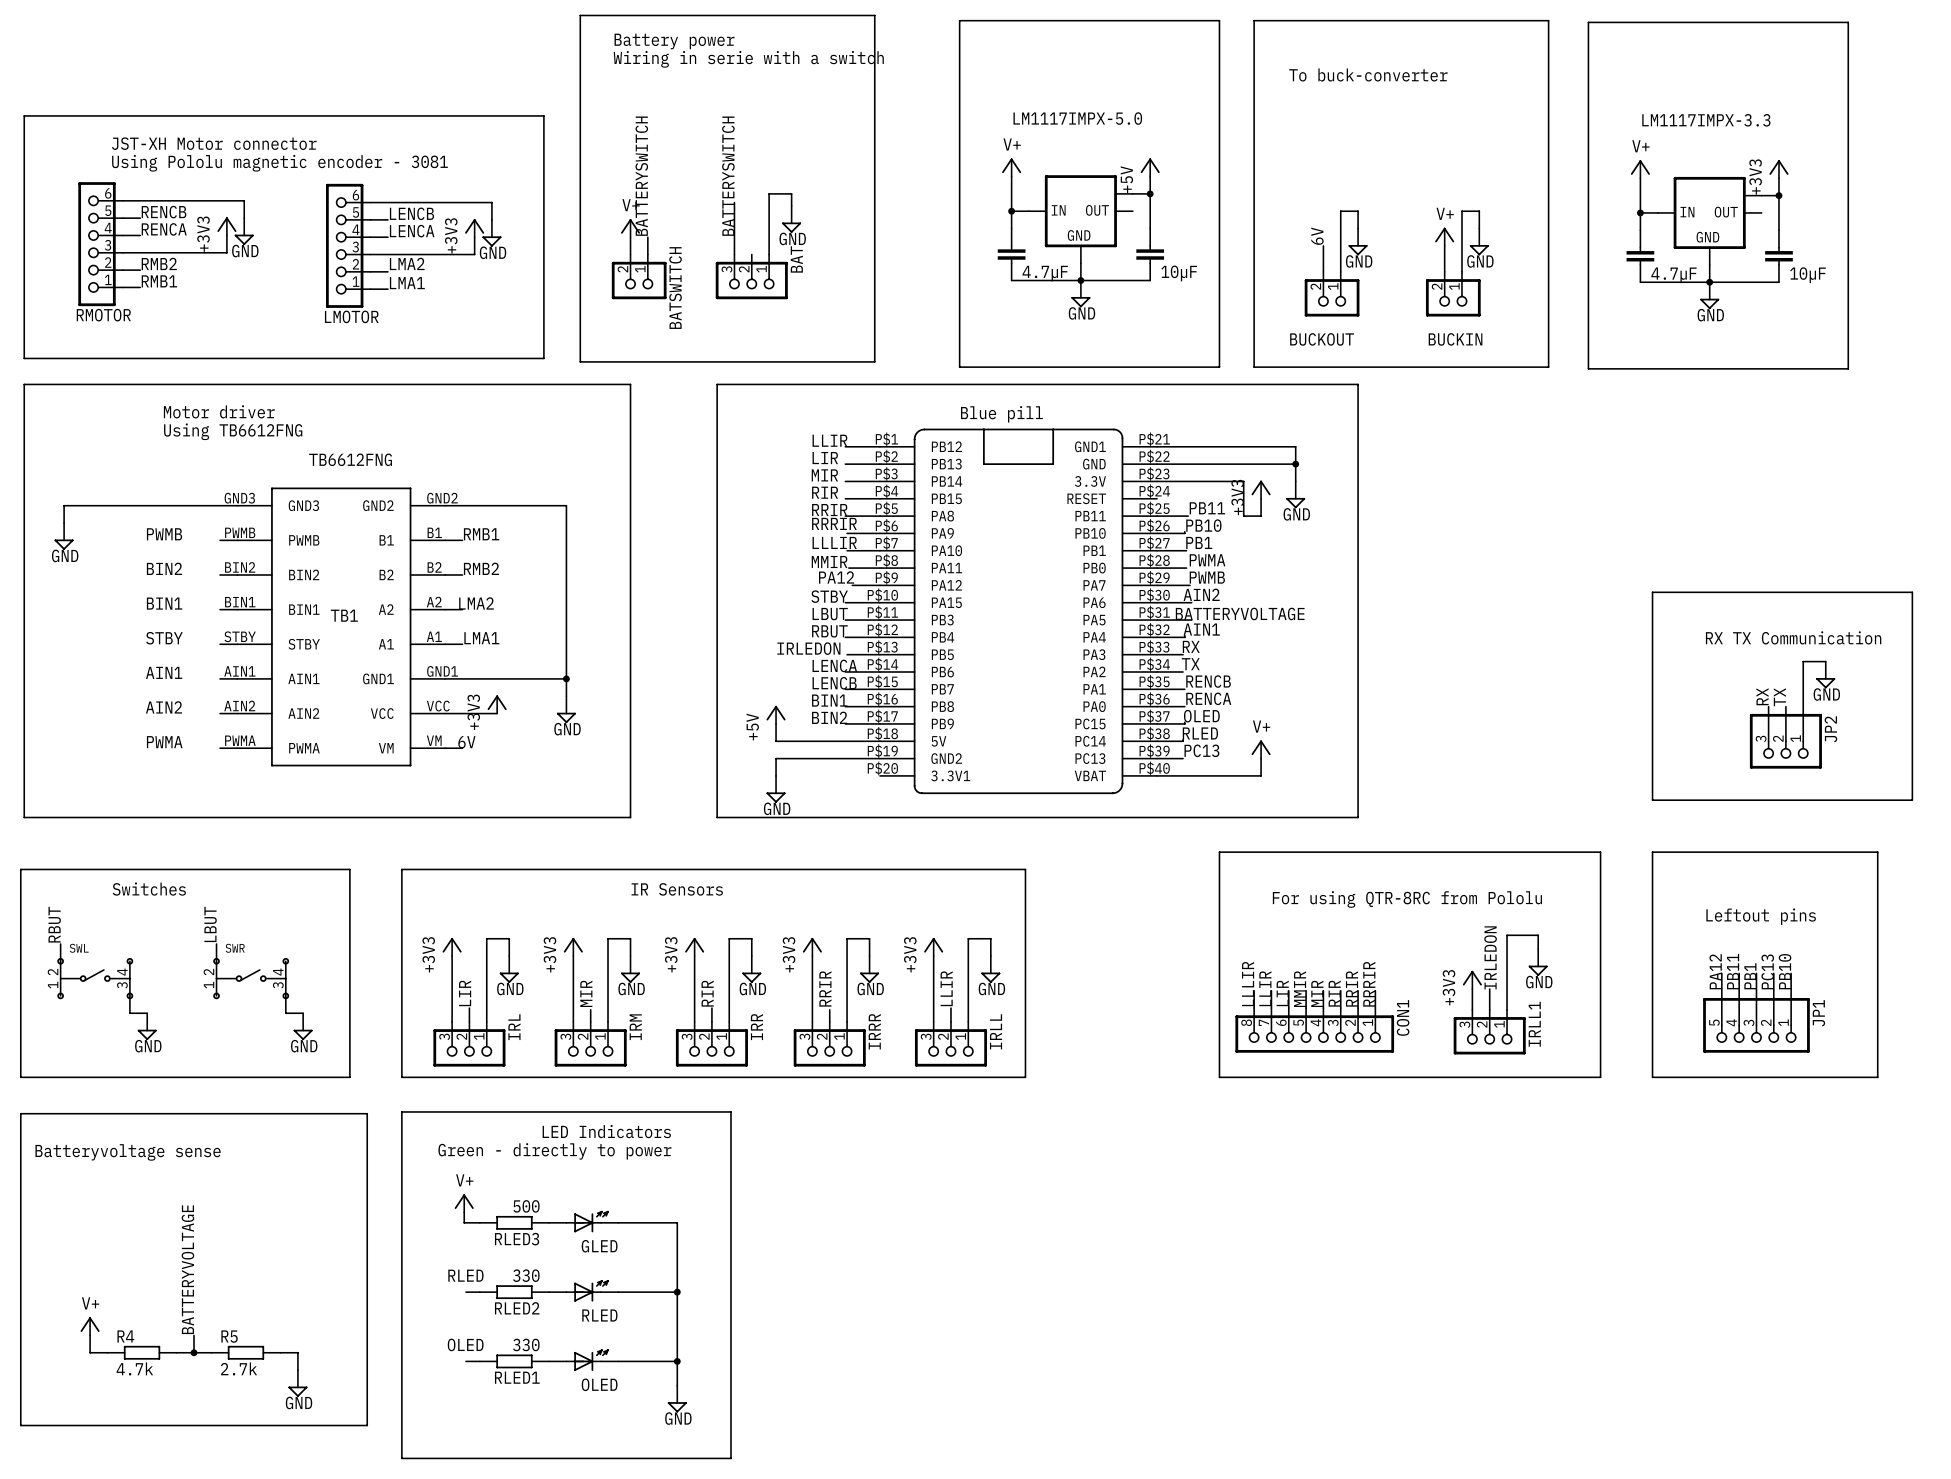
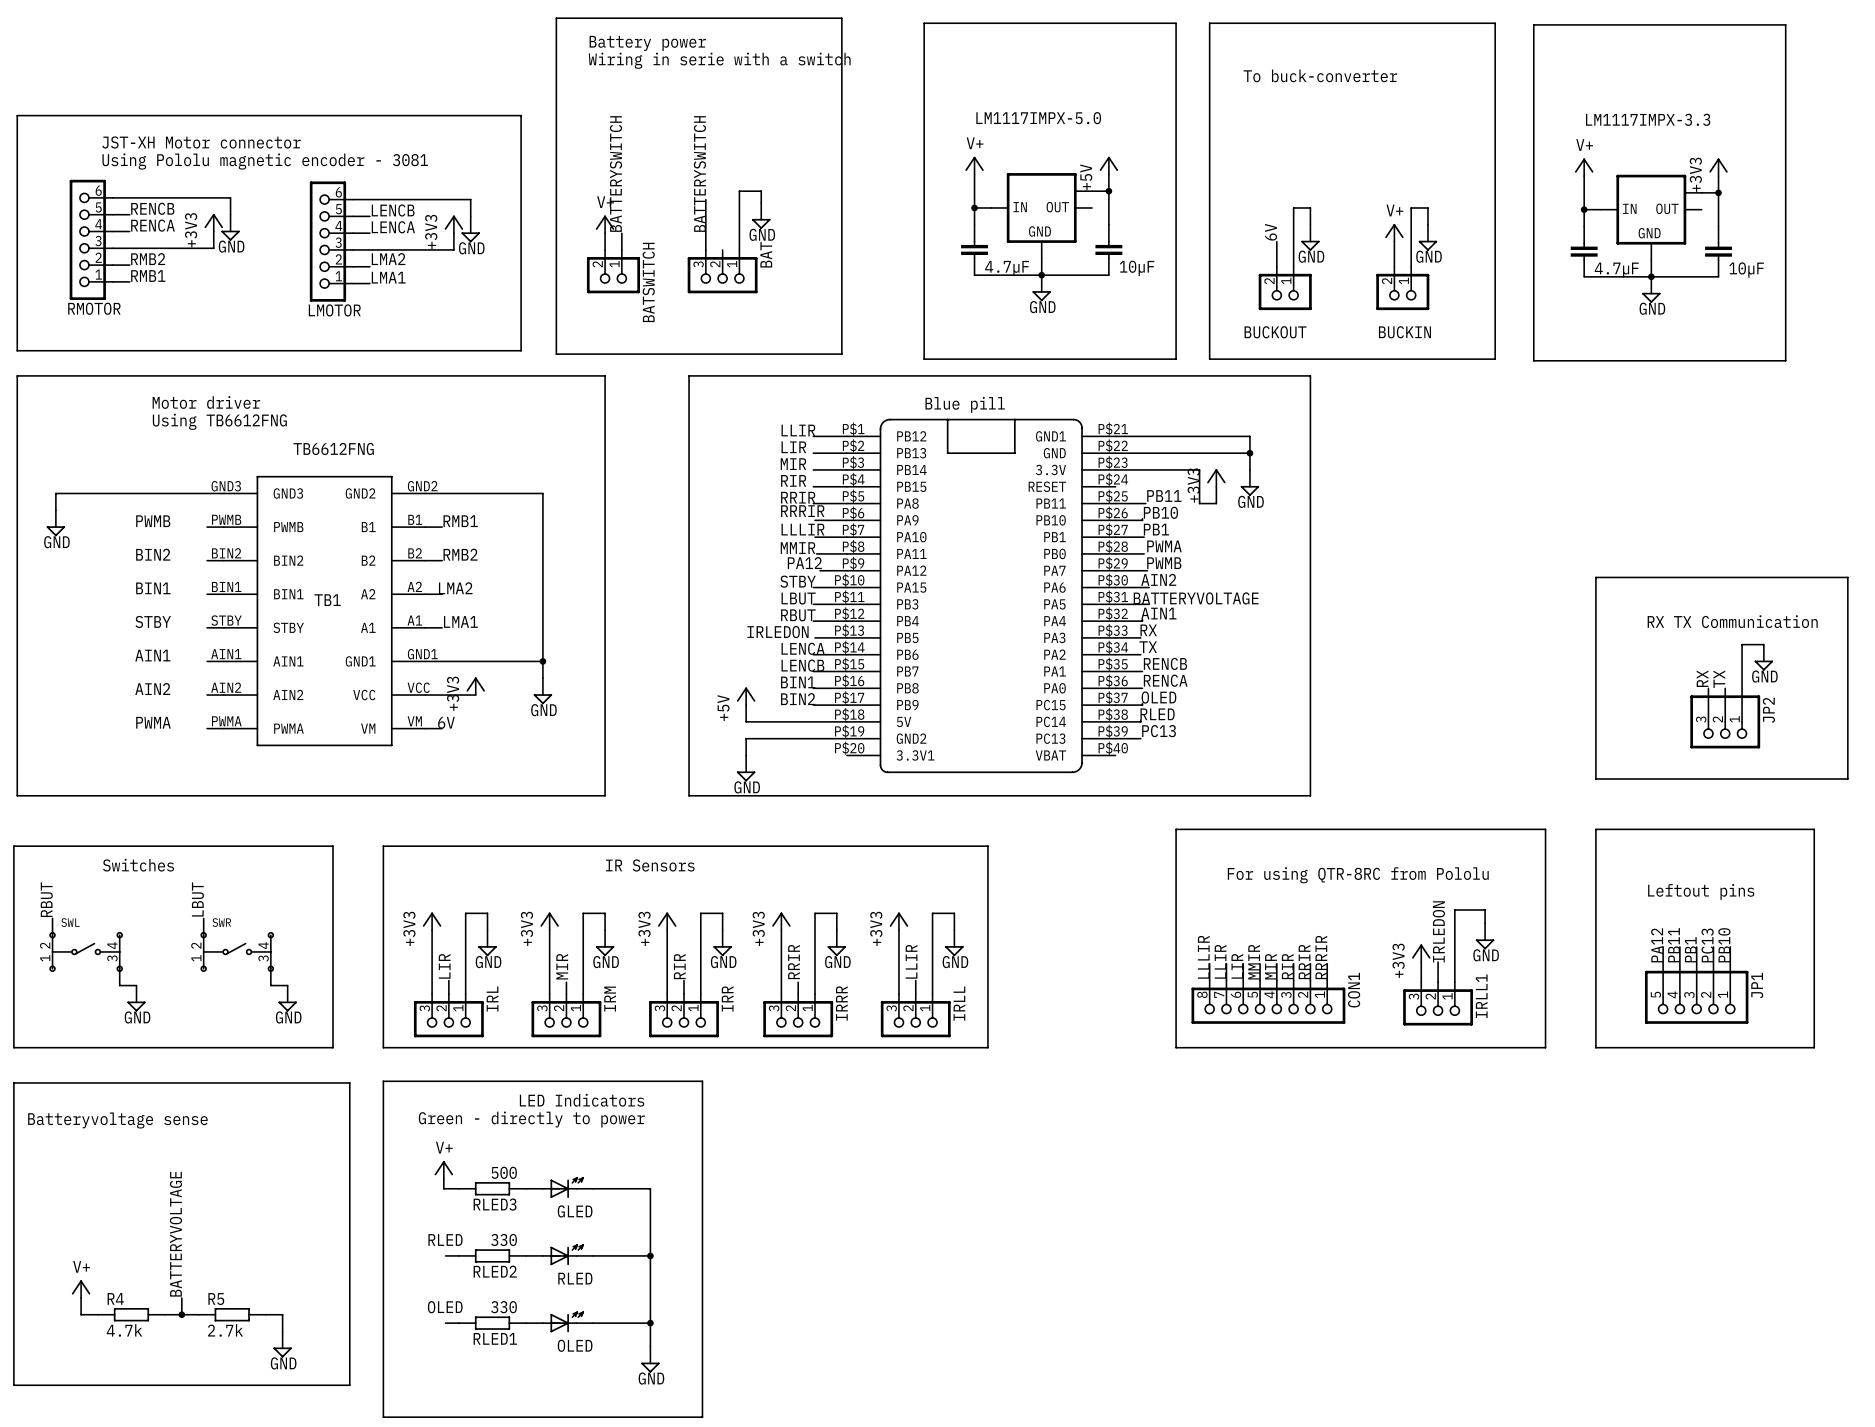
power symbol: V+ (1261, 749) -> none
wire: (1261, 758) (1261, 775) (1157, 775) -> none

